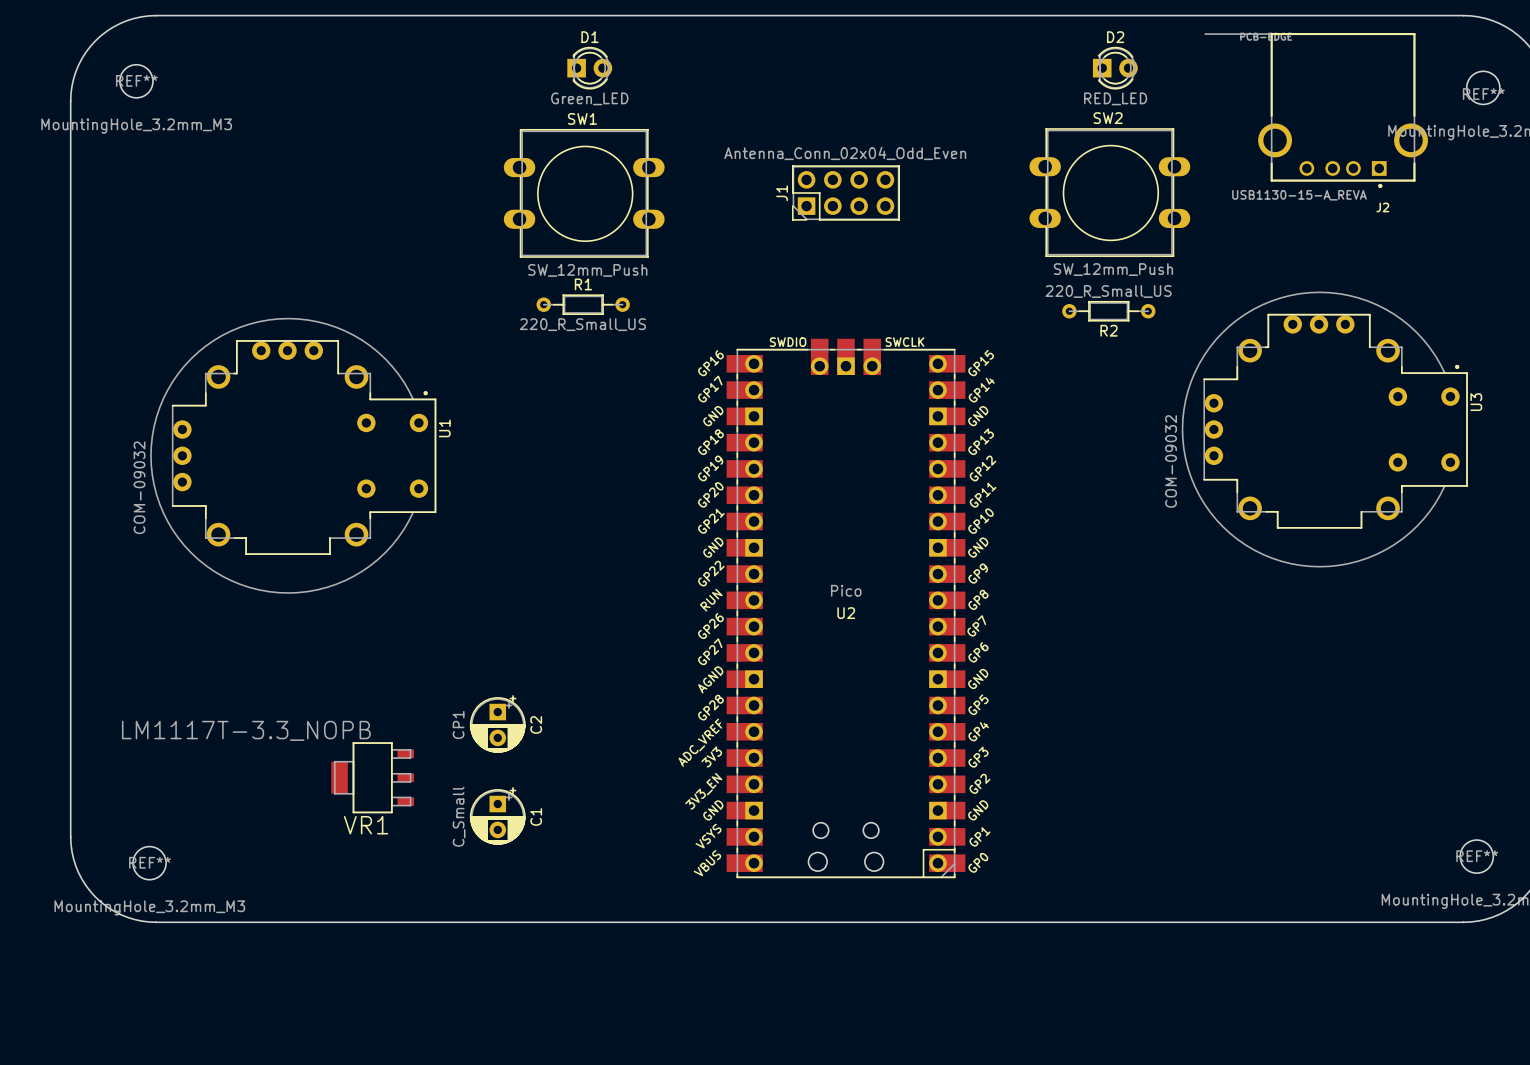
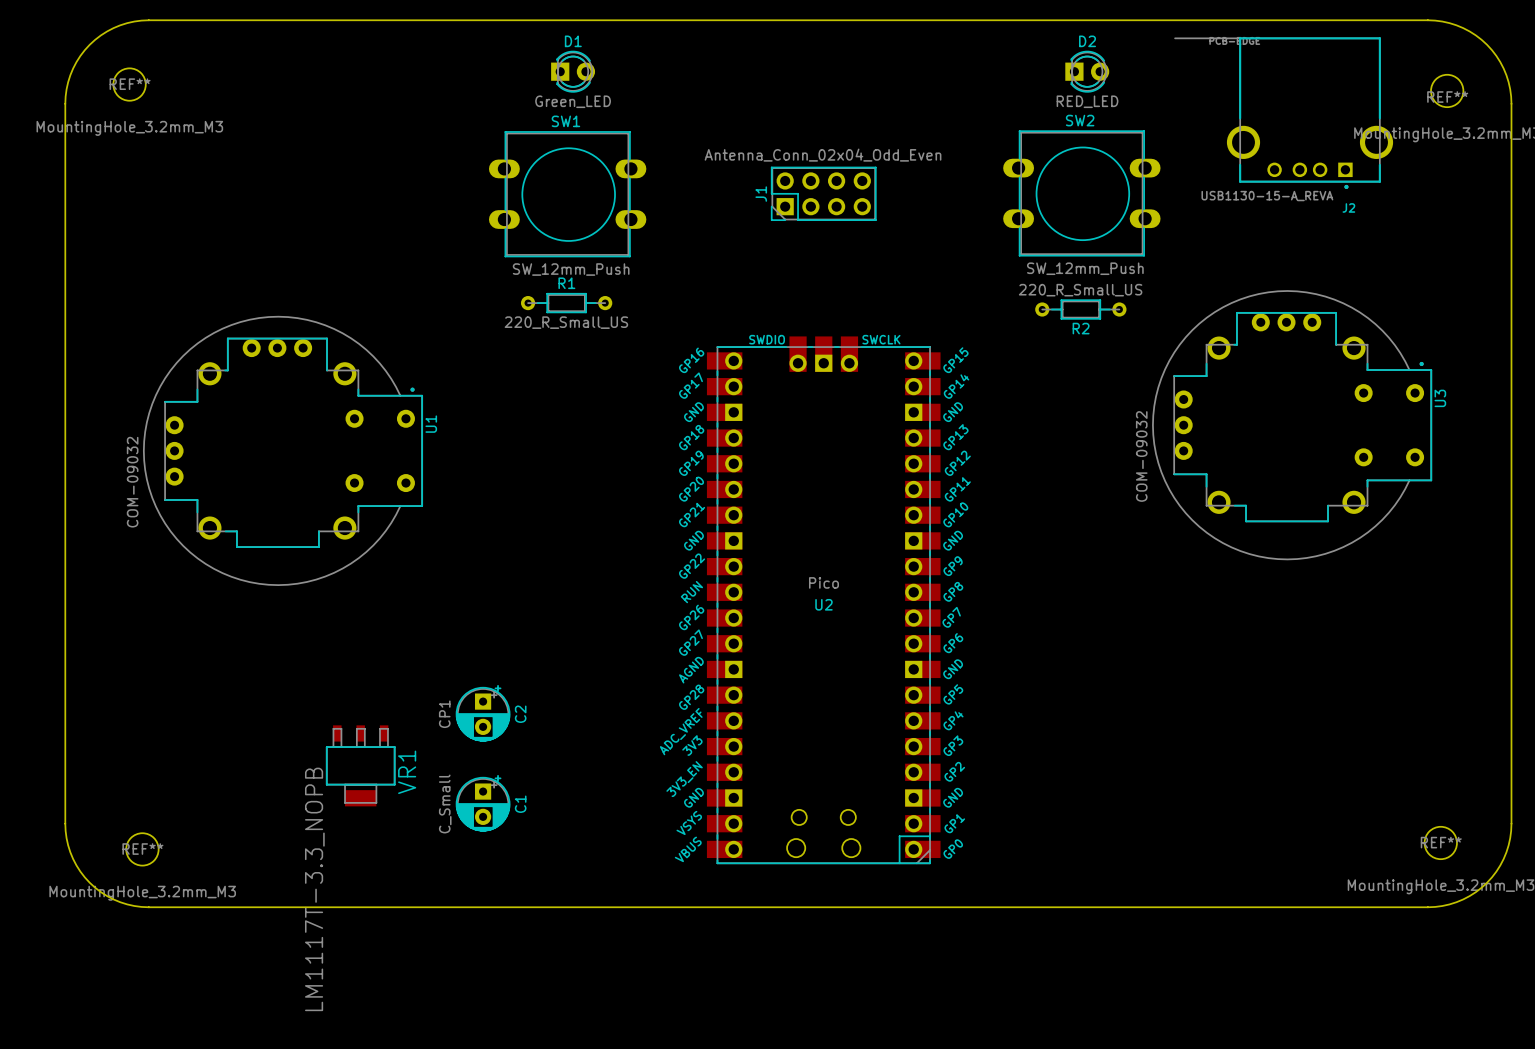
VR1 rotation: 0° (372, 777) -> 90° counterclockwise (360, 765)

